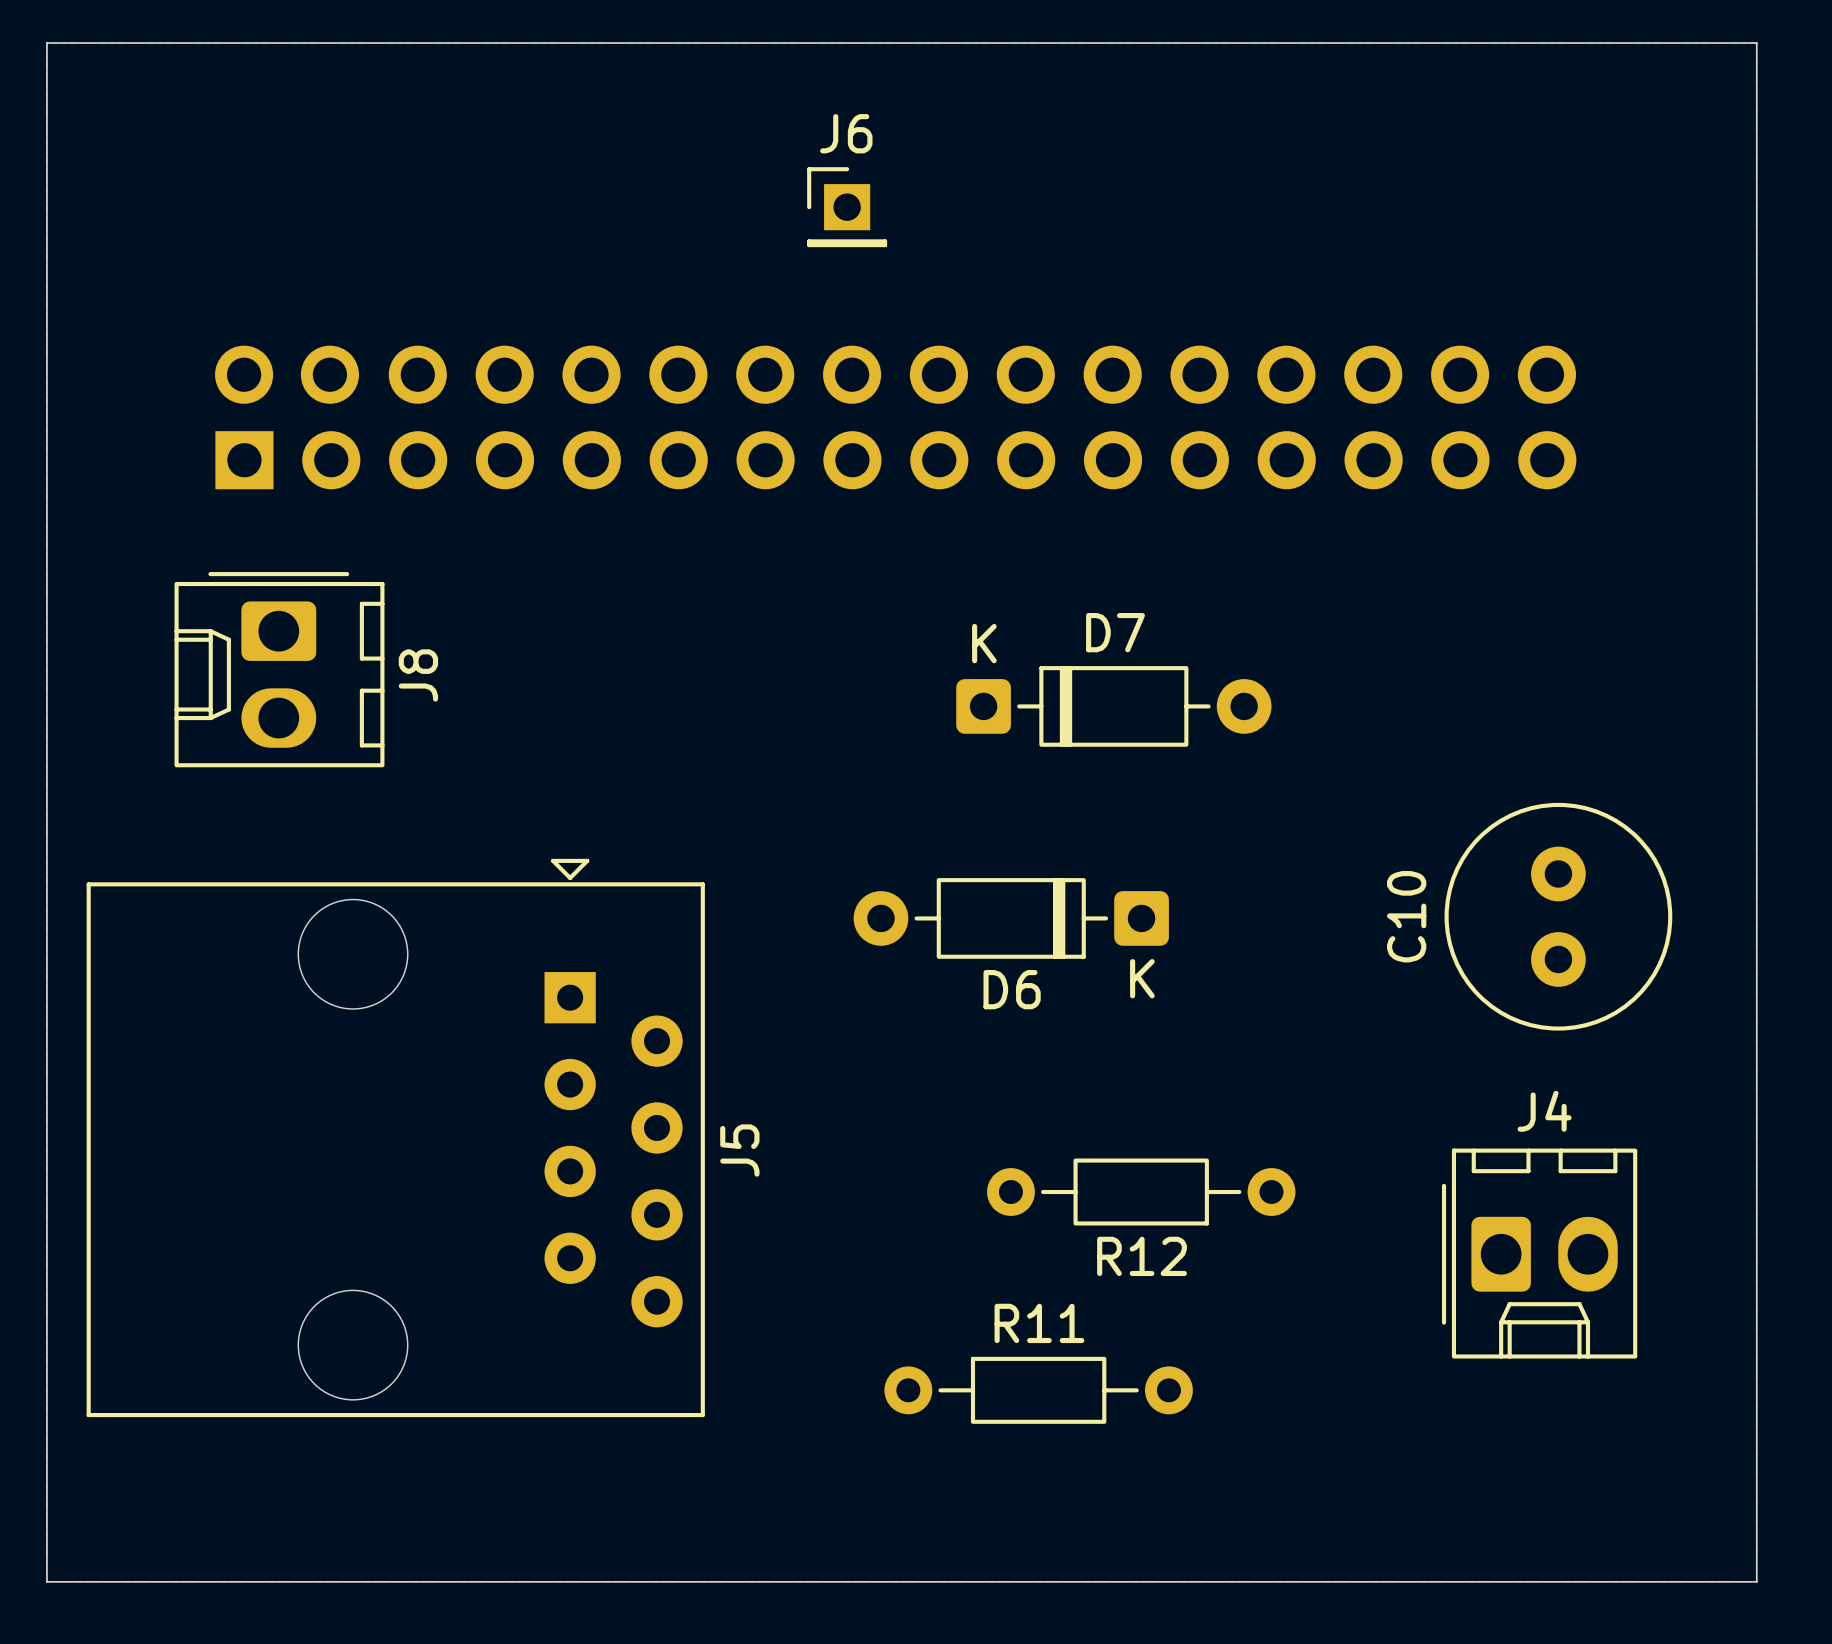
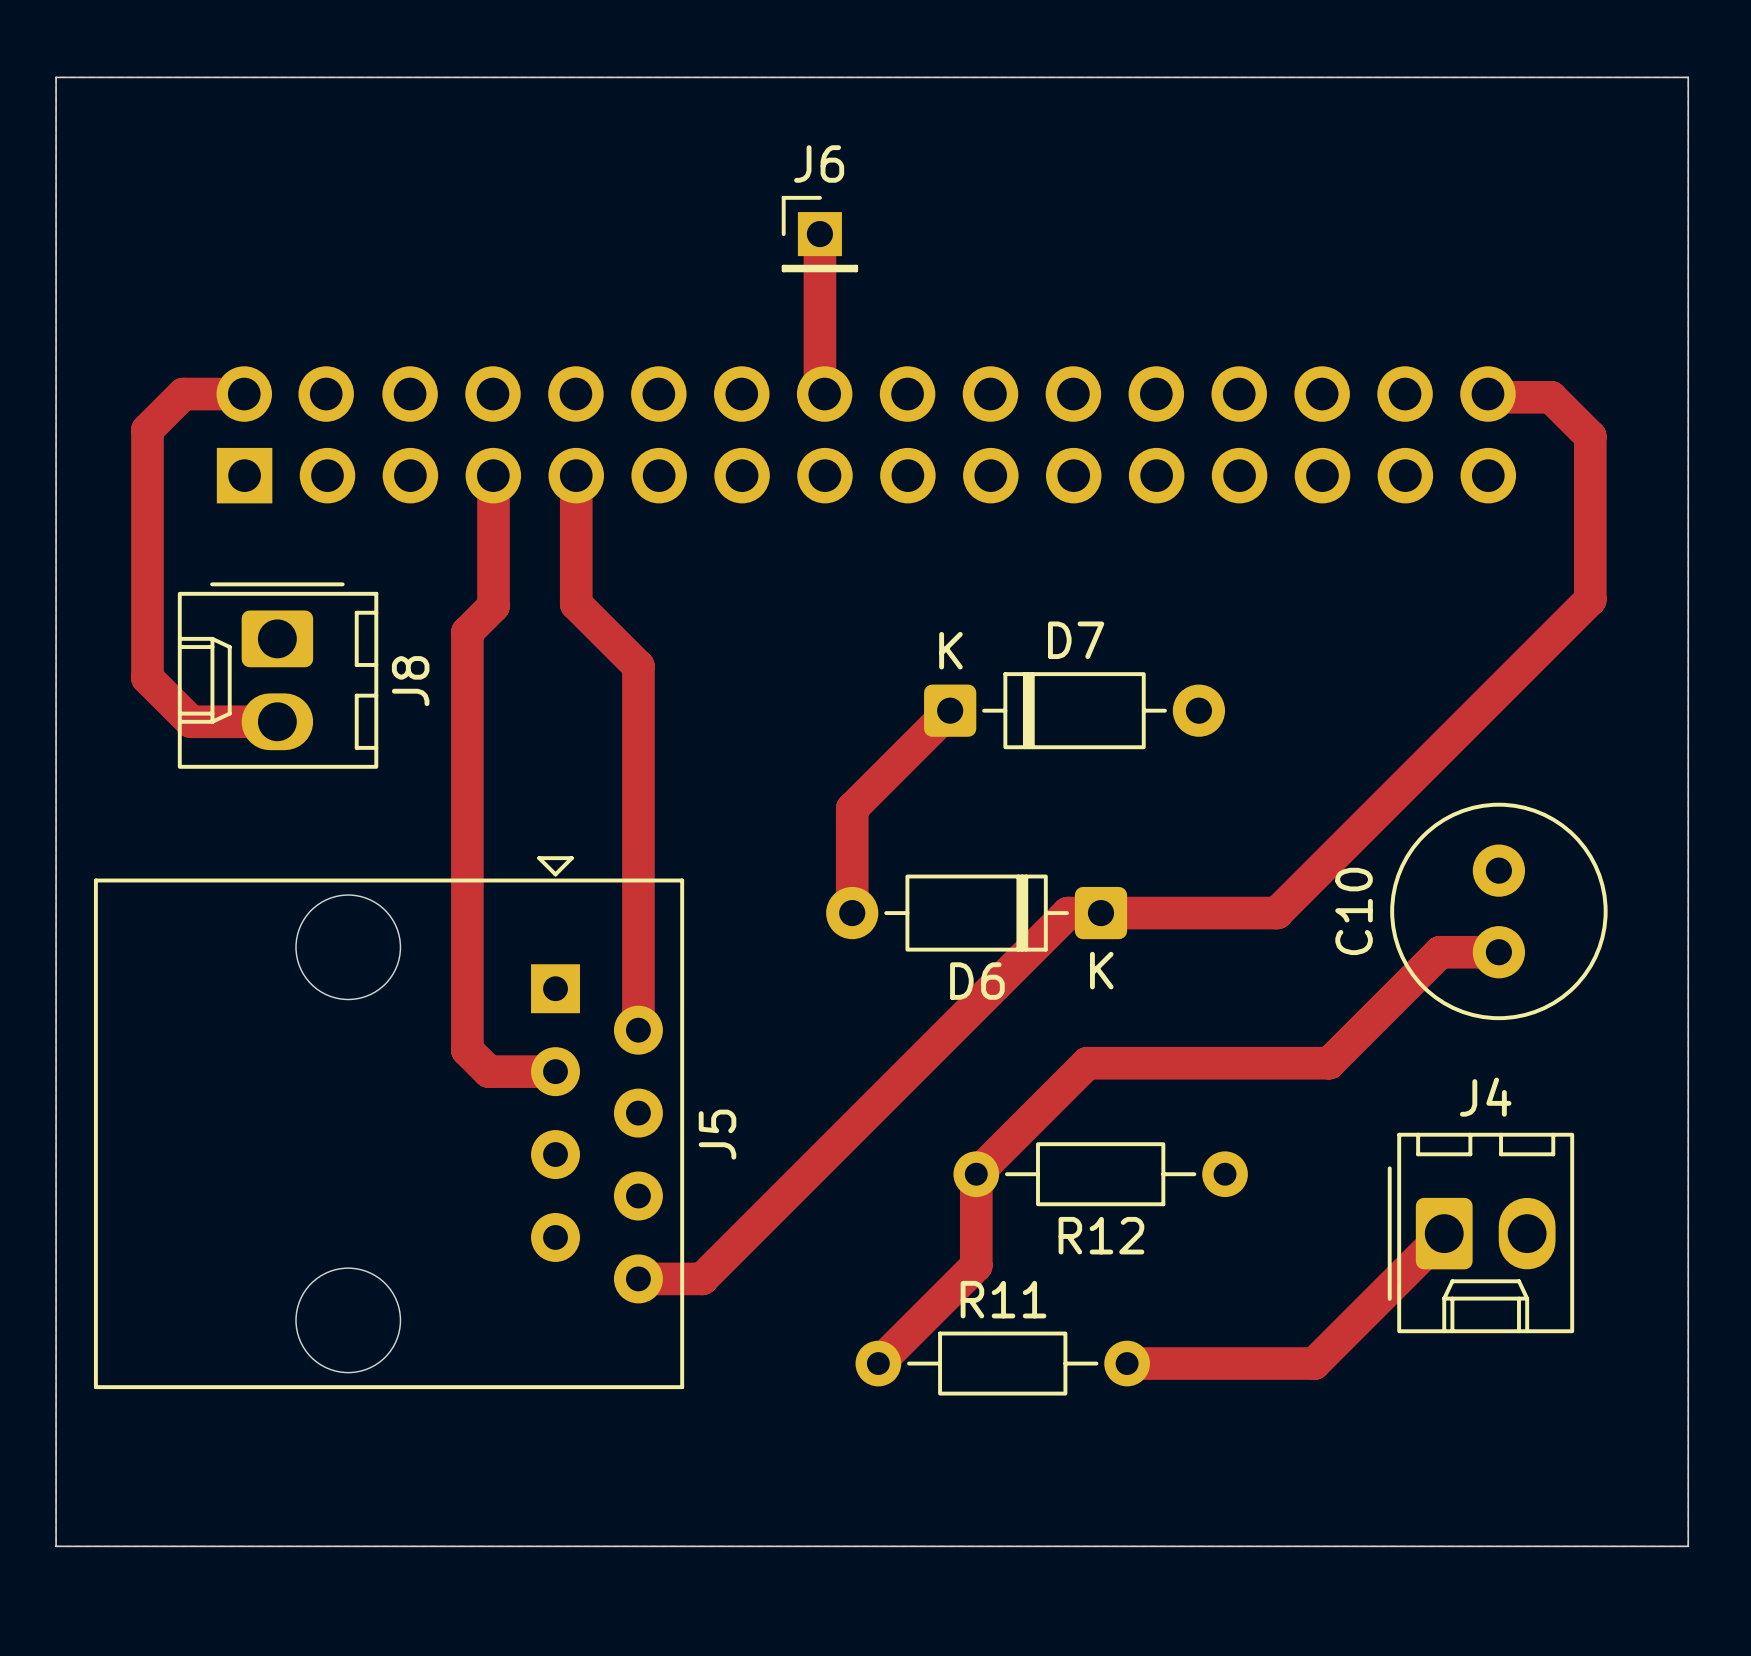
top track: none -> (819, 234) (819, 389) (824, 394)
top track: none -> (244, 394) (183, 394) (147, 429) (147, 678) (191, 721) (277, 721)
top track: none -> (1487, 394) (1491, 397) (1551, 397) (1590, 436) (1590, 599) (1276, 913) (1068, 913) (702, 1278) (638, 1278)
top track: none -> (493, 475) (493, 606) (467, 632) (467, 1050) (488, 1071) (555, 1071)
top track: none -> (576, 475) (576, 604) (638, 666) (638, 1030)
top track: none -> (950, 710) (852, 808) (852, 913)
top track: none -> (1498, 952) (1440, 952) (1329, 1063) (1087, 1063) (976, 1174) (976, 1265) (878, 1363)
top track: none -> (1444, 1233) (1314, 1363) (1127, 1363)

